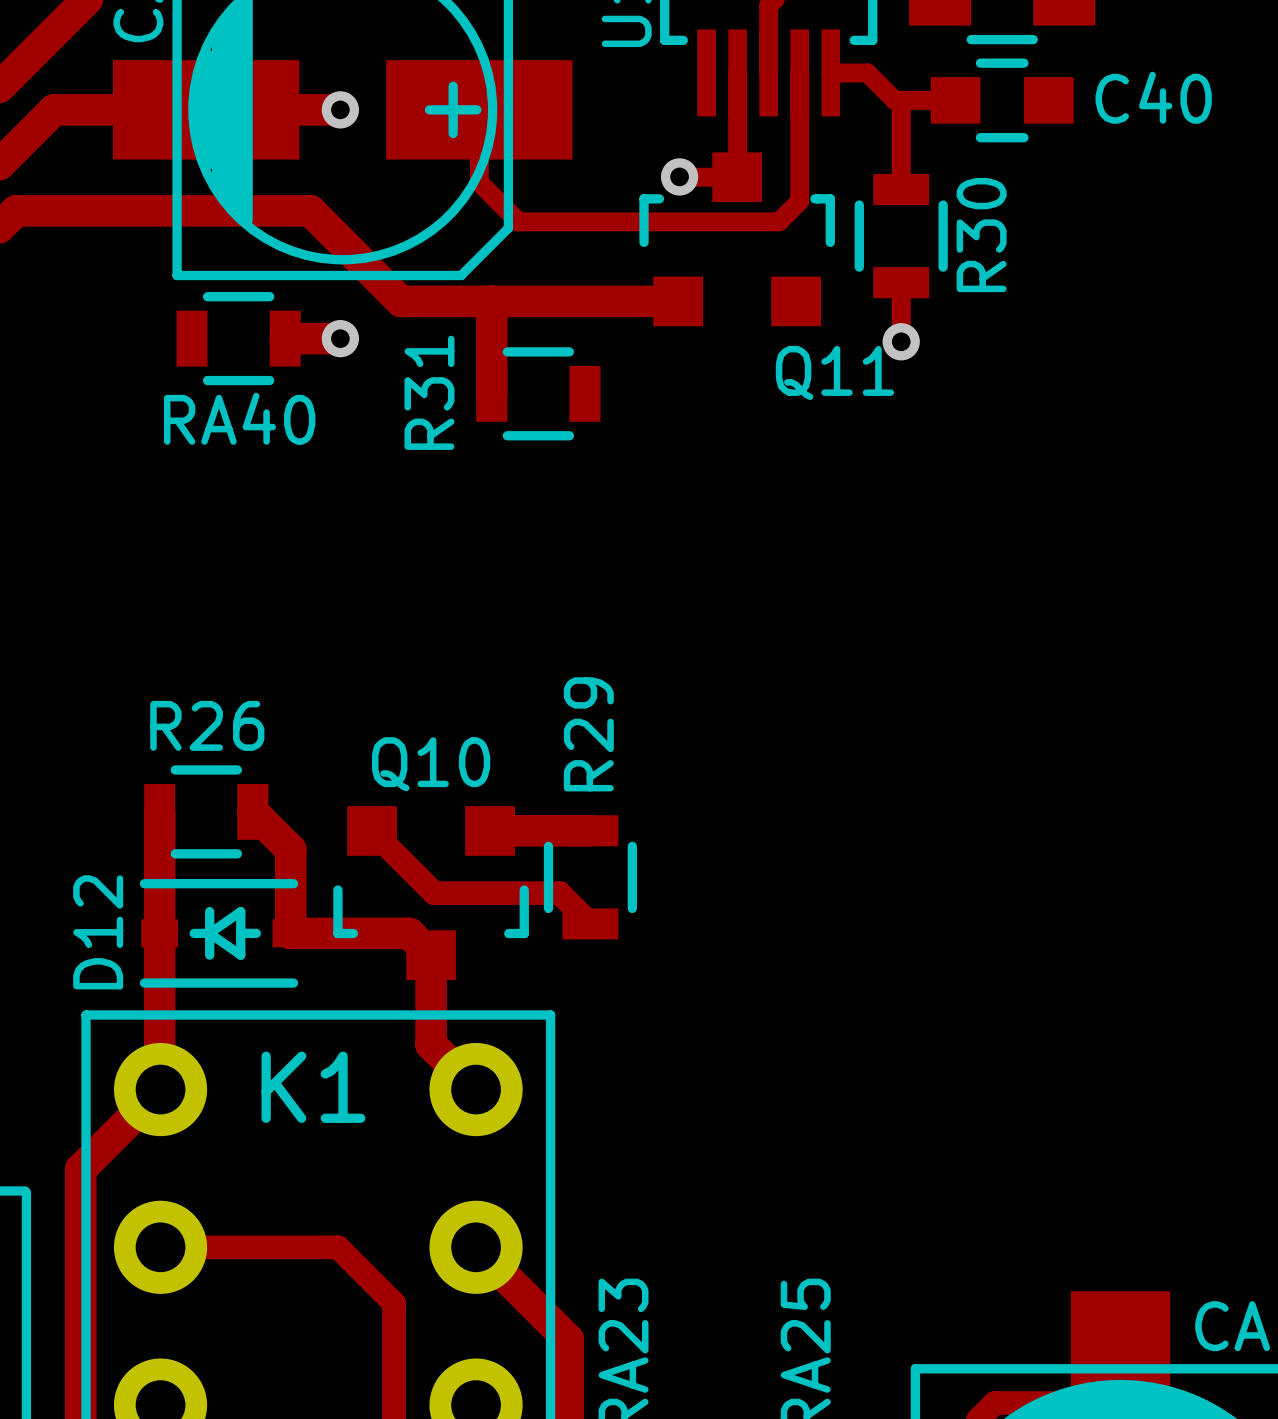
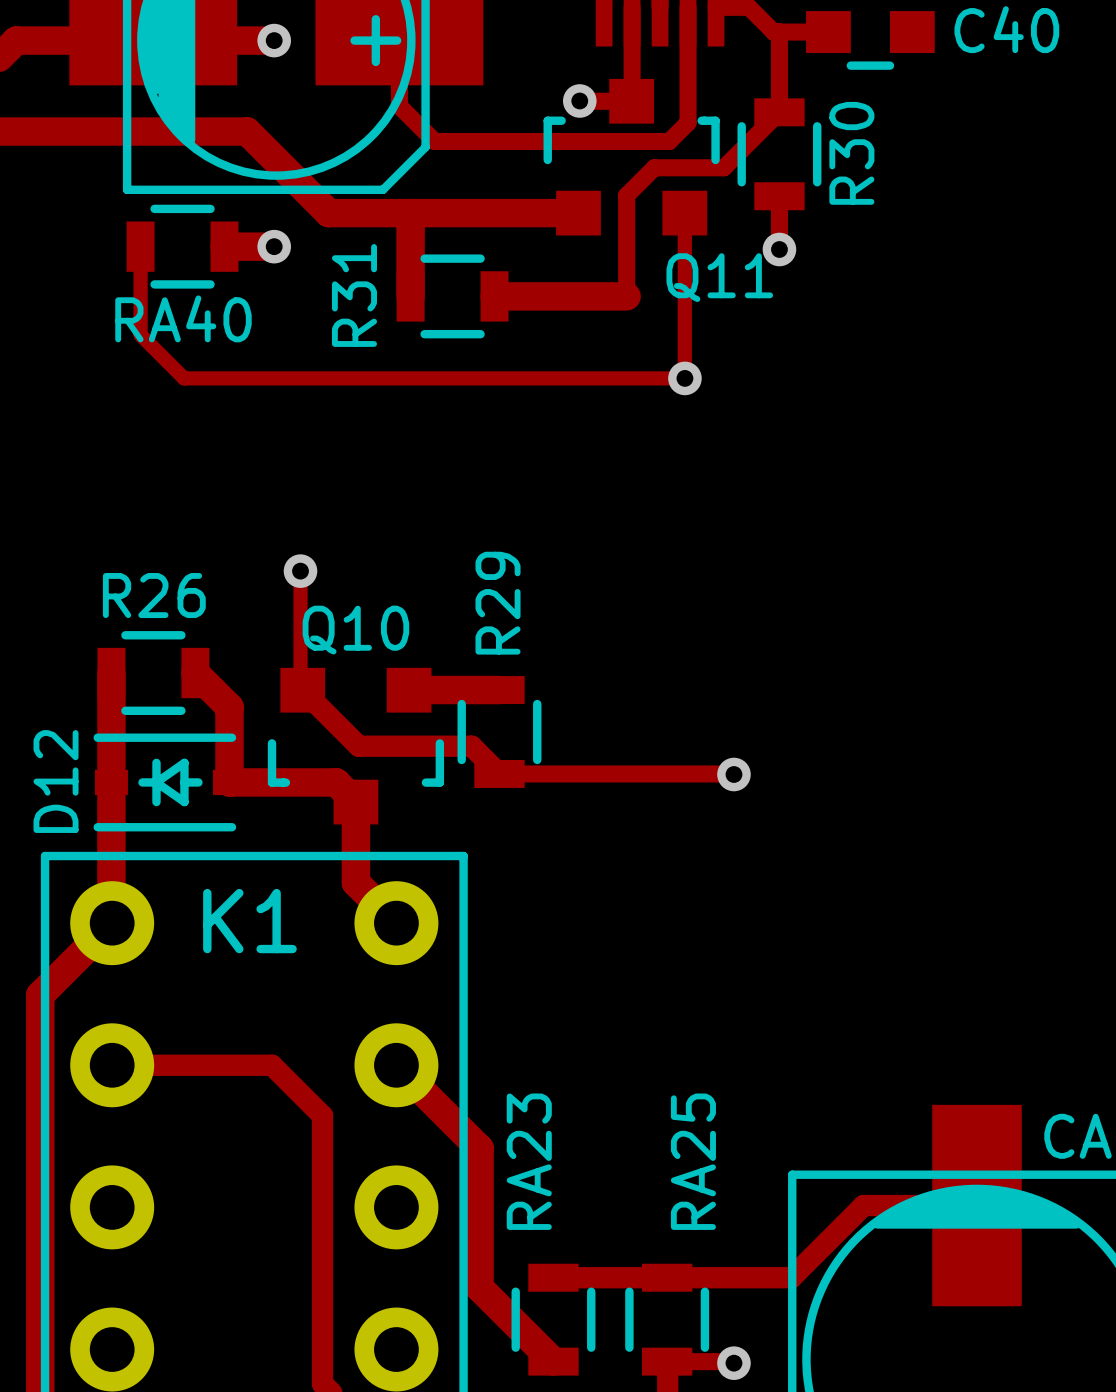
track: none -> (779, 112) (723, 167) (654, 167) (626, 195) (626, 296) (494, 296)
track: none -> (684, 213) (684, 378) (184, 378) (140, 334) (140, 246)
via: none -> (684, 378)
track: none -> (300, 571) (300, 687)
via: none -> (300, 571)
track: none -> (499, 773) (733, 773)
via: none -> (733, 774)

